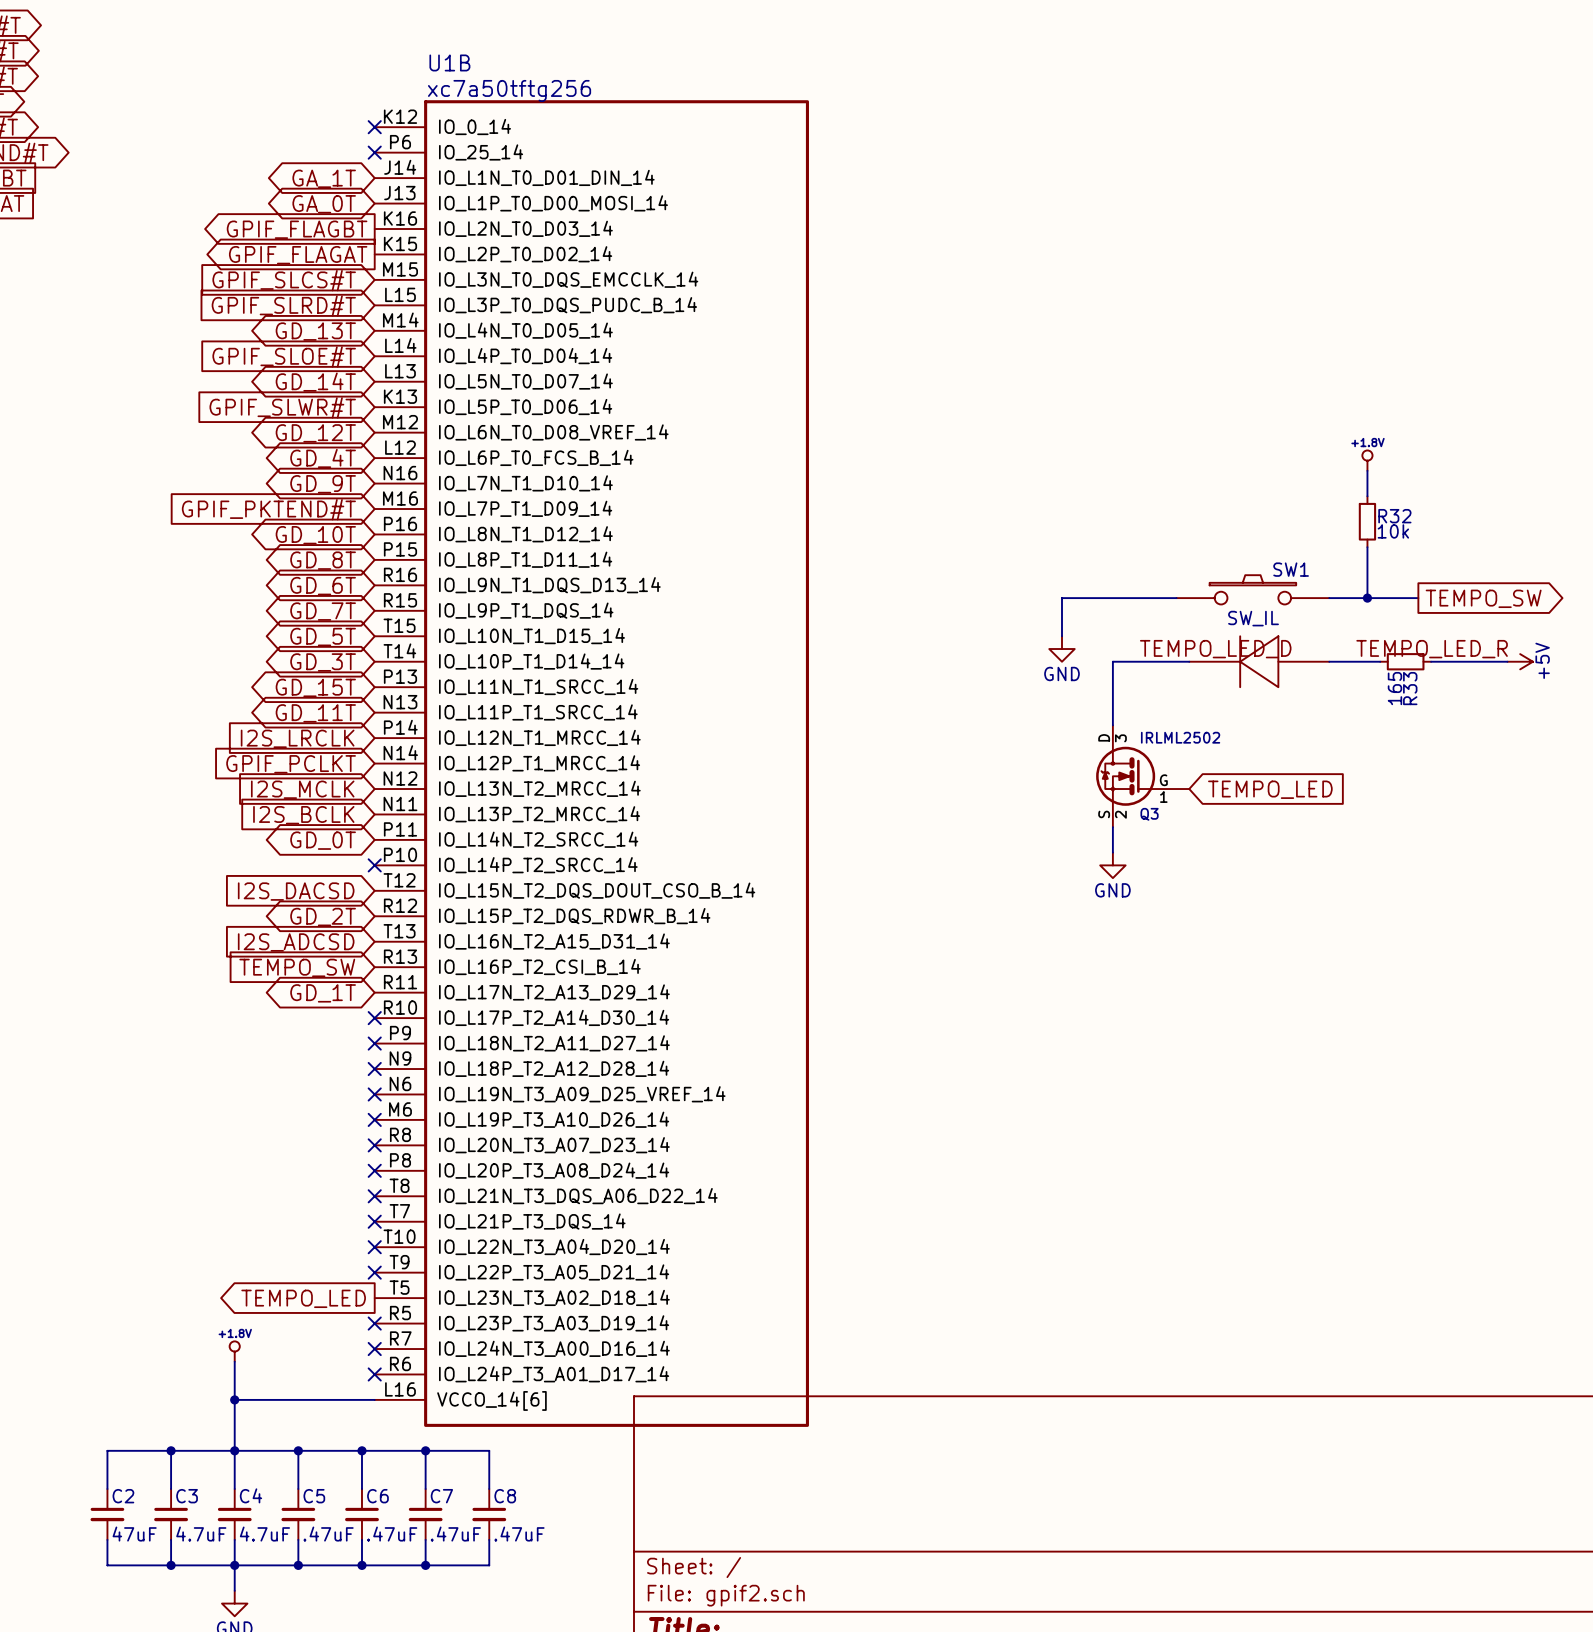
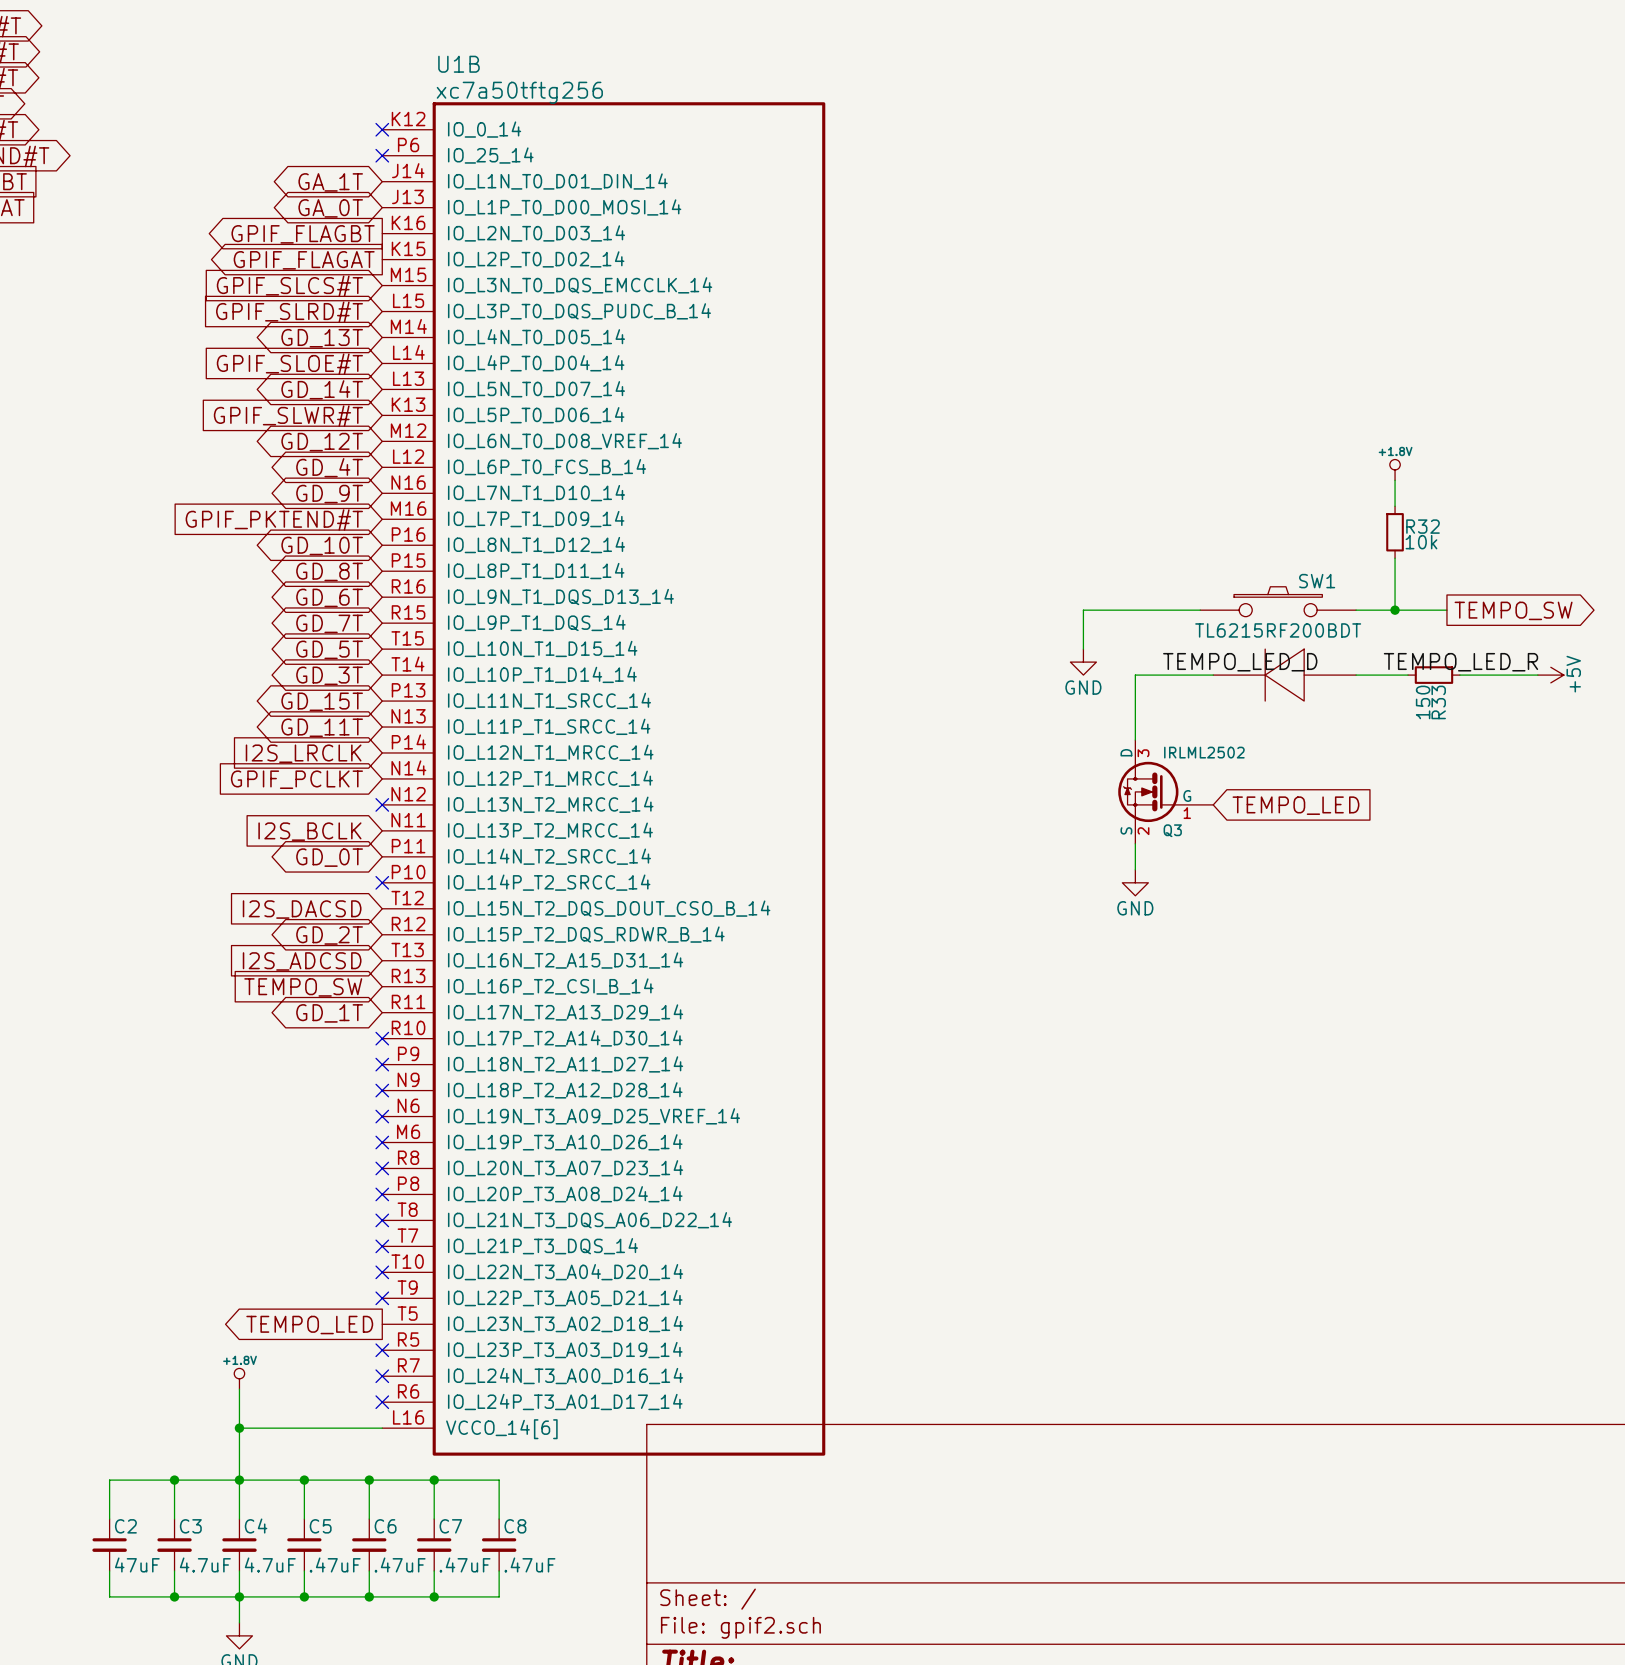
SW1 value: SW_IL (1253, 618) -> TL6215RF200BDT (1278, 630)
R33 value: 165 (1394, 688) -> 150 (1423, 702)
global label: I2S_MCLK (302, 789) -> none
no-connect mark: none -> (382, 804)

